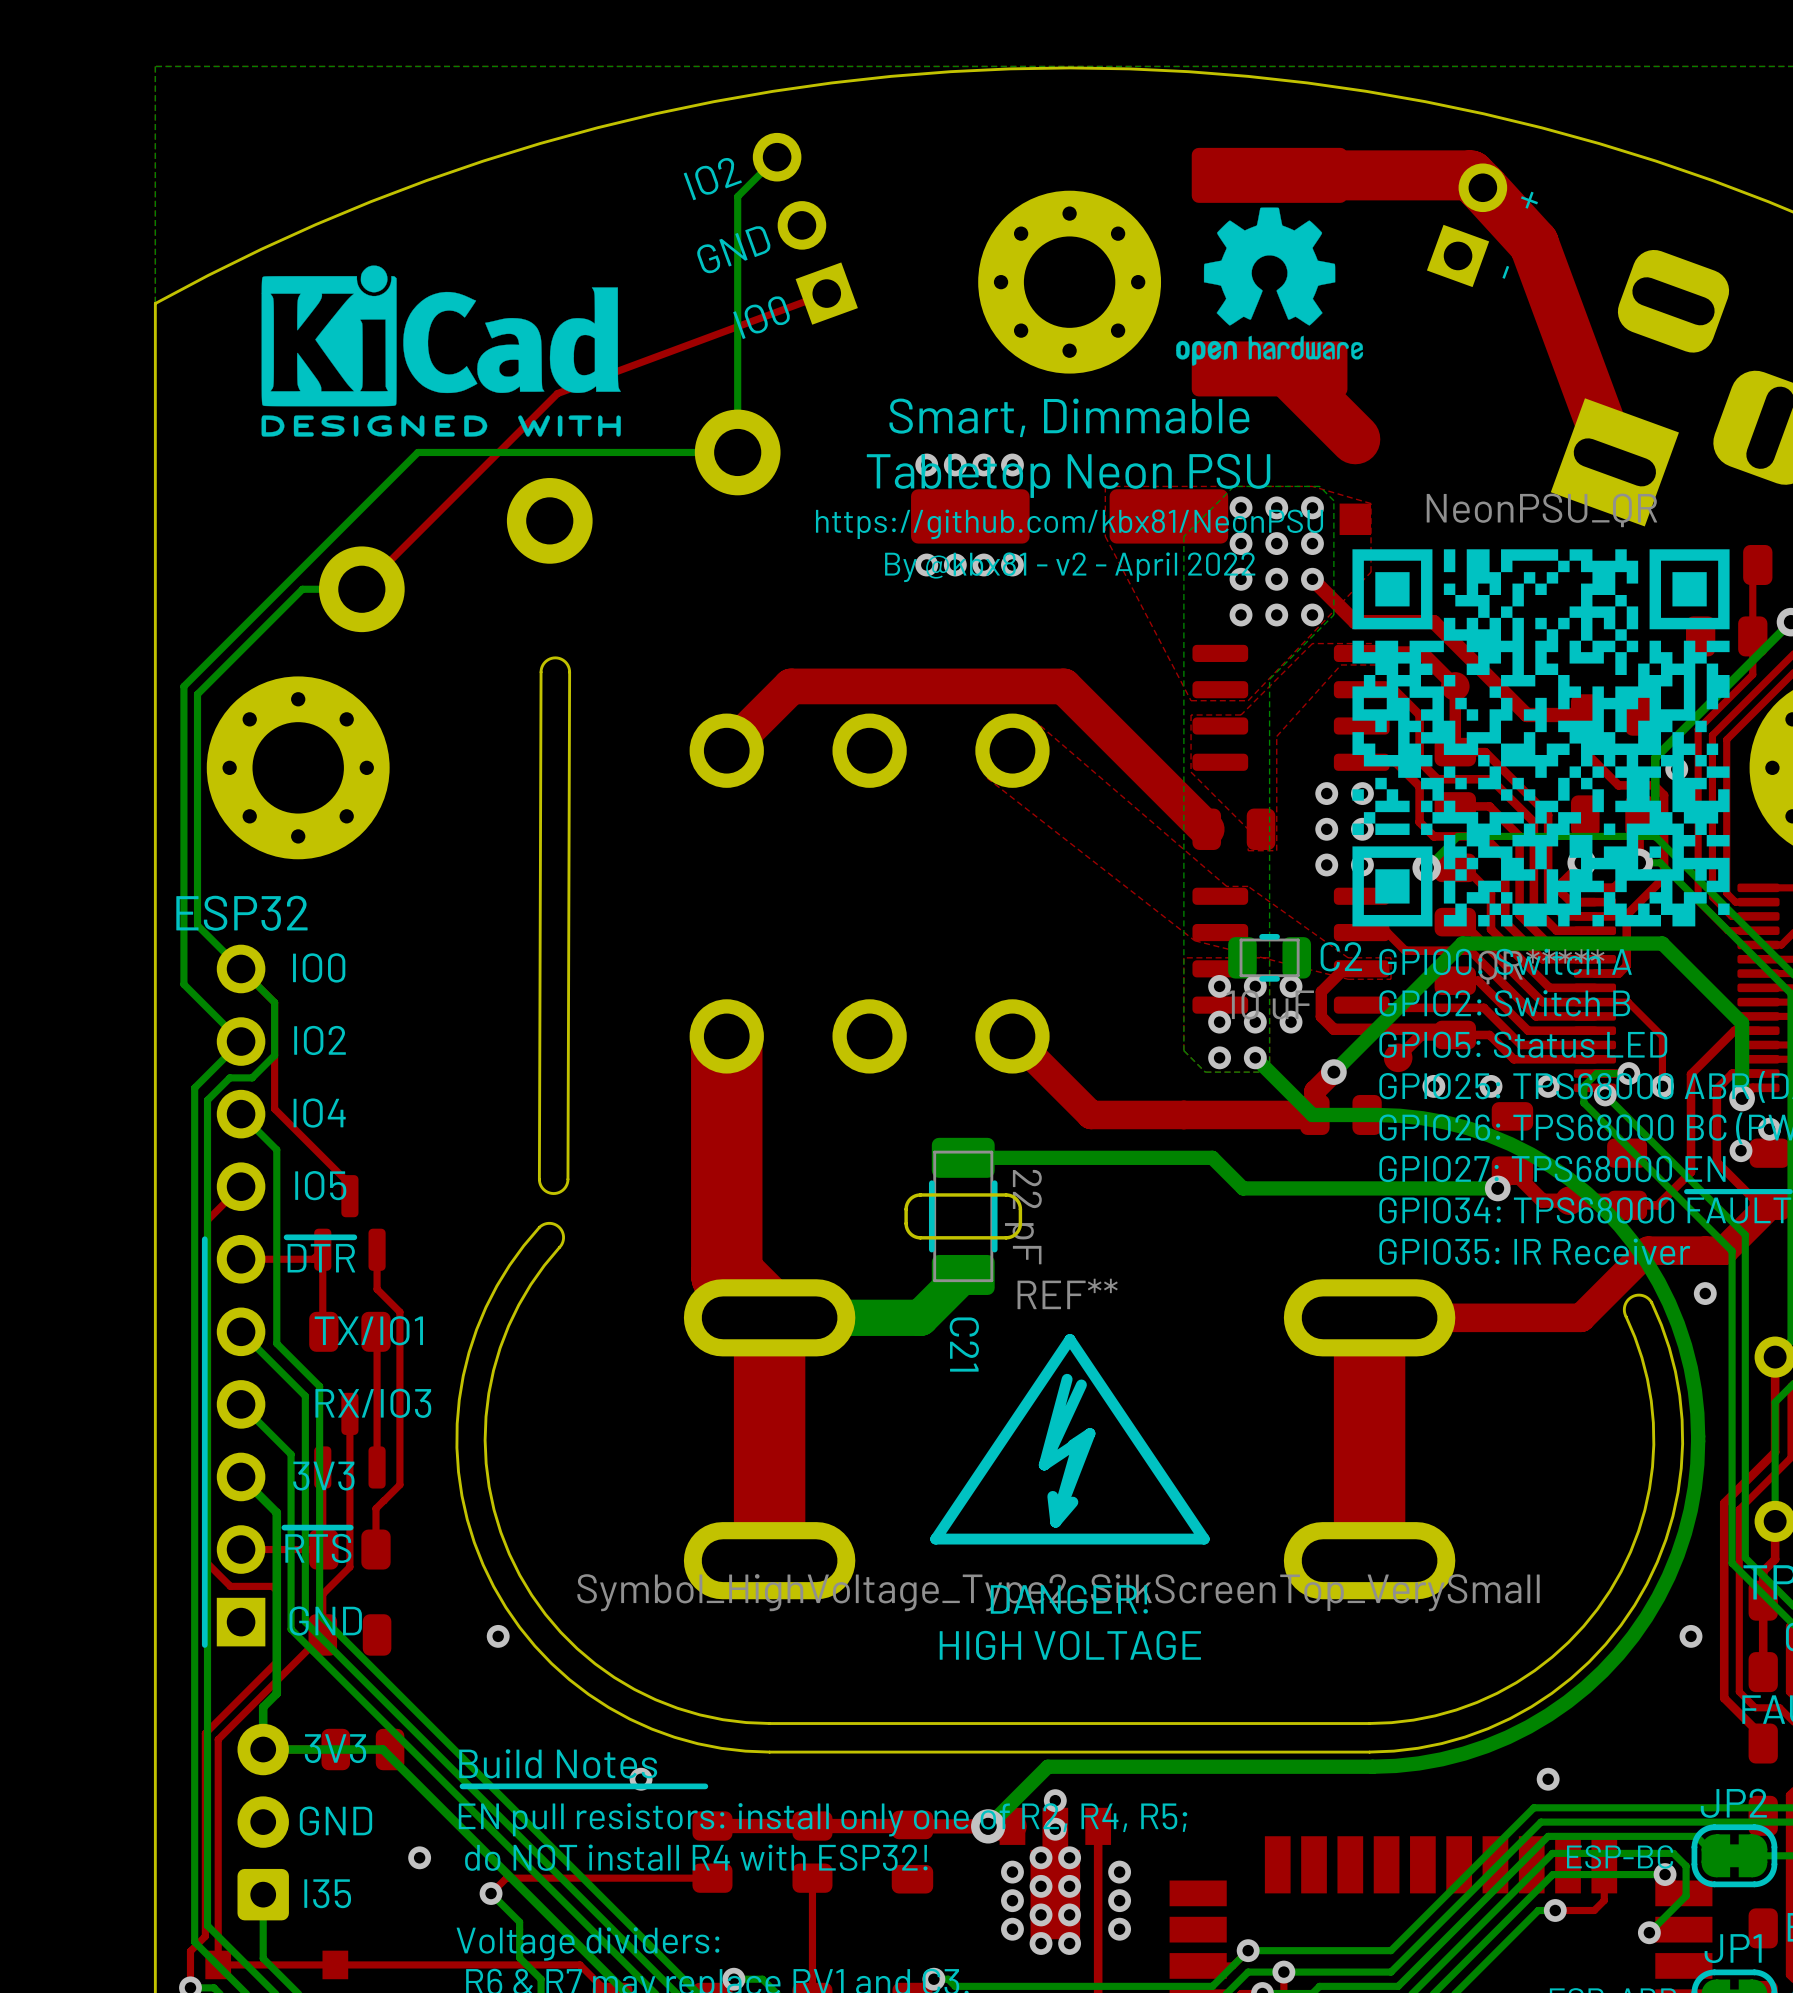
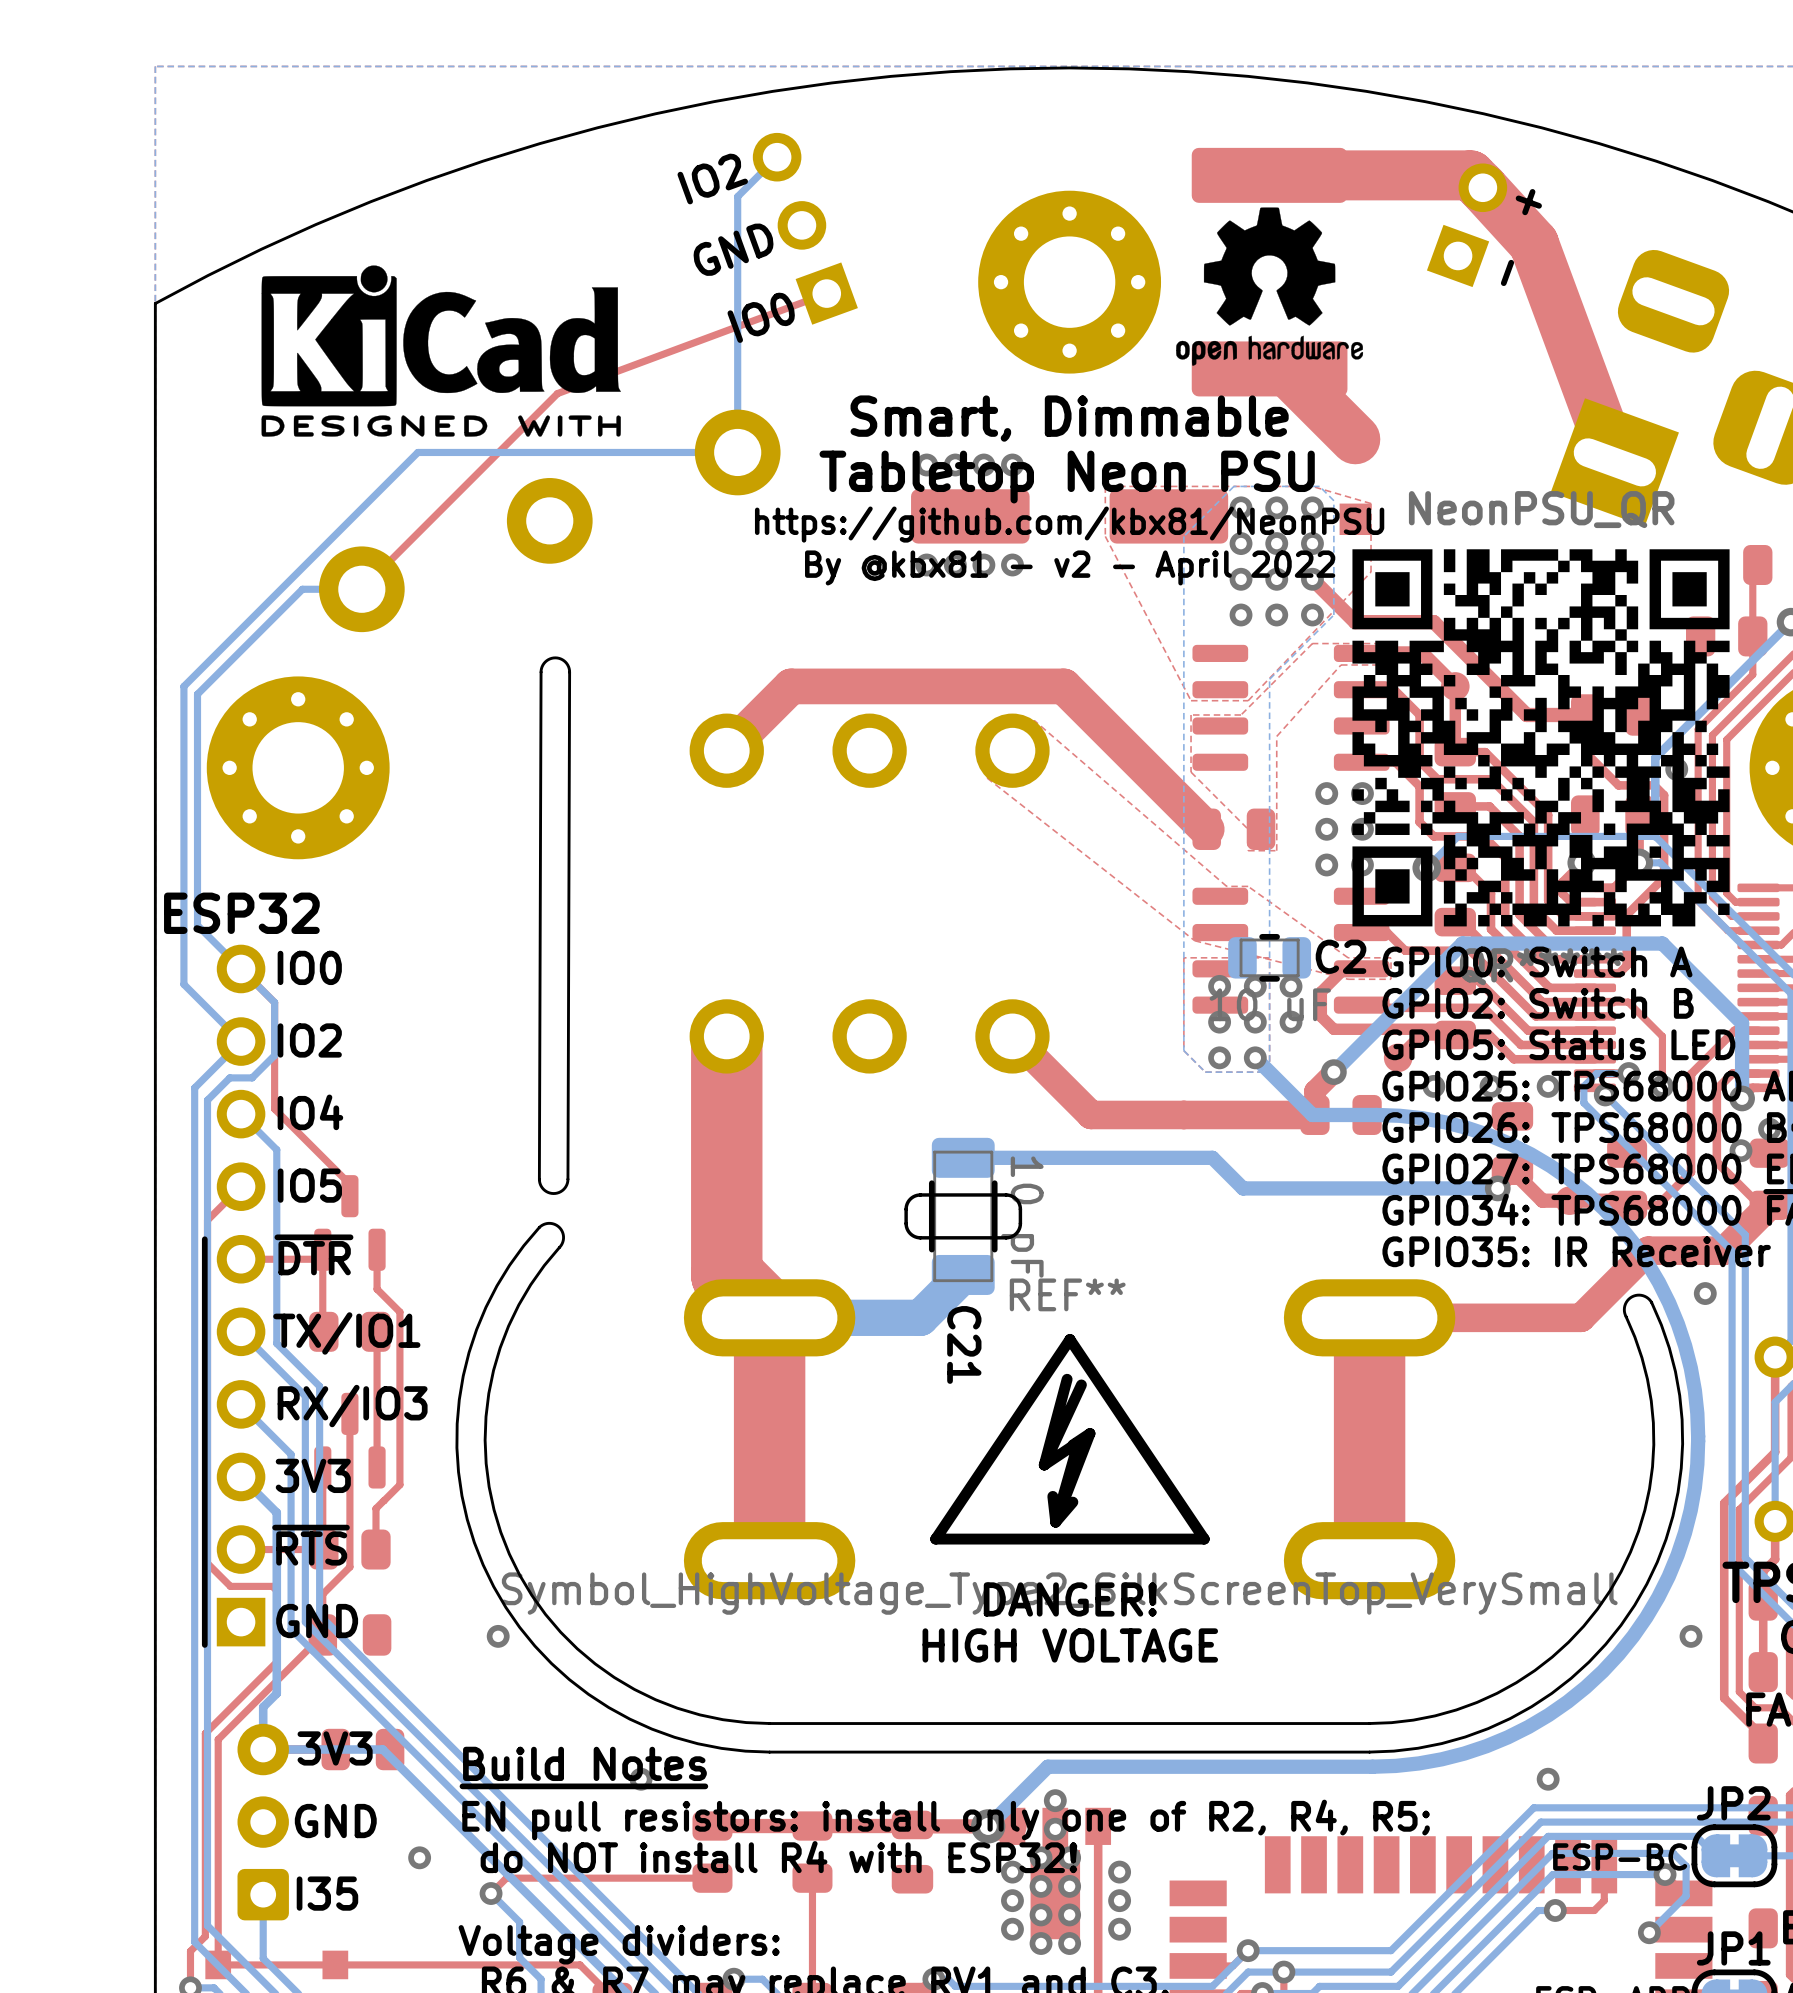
C21 value: 22 pF (1023, 1217) -> 10 pF (1022, 1217)

